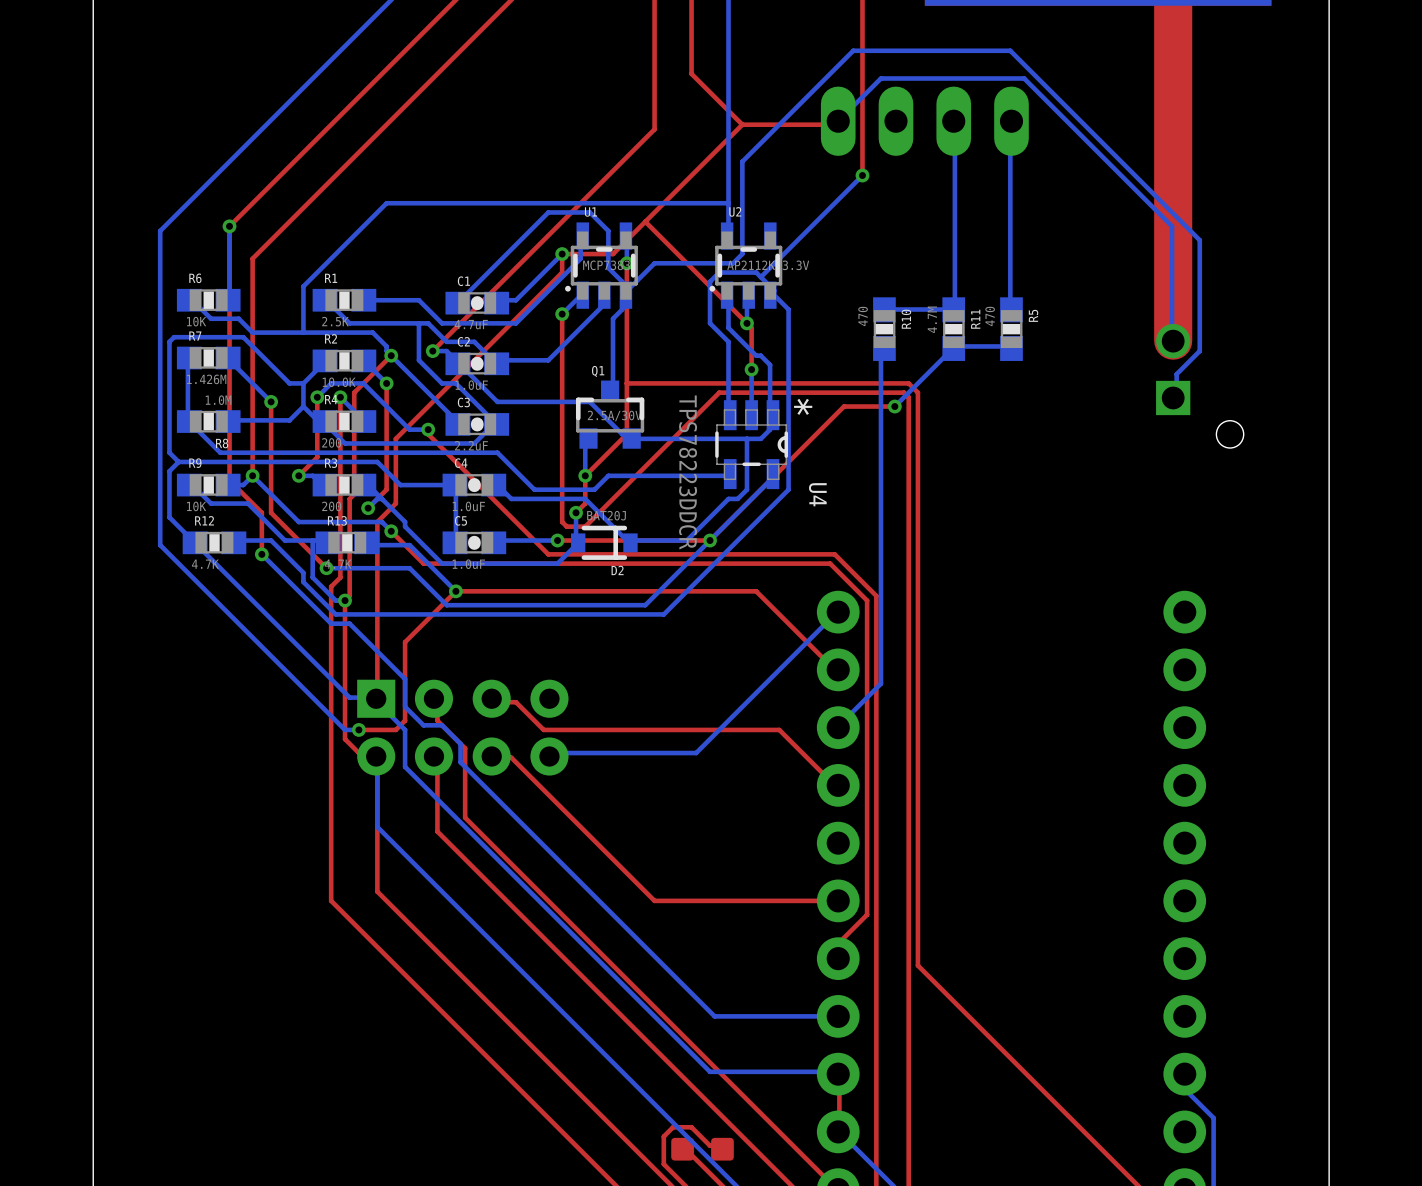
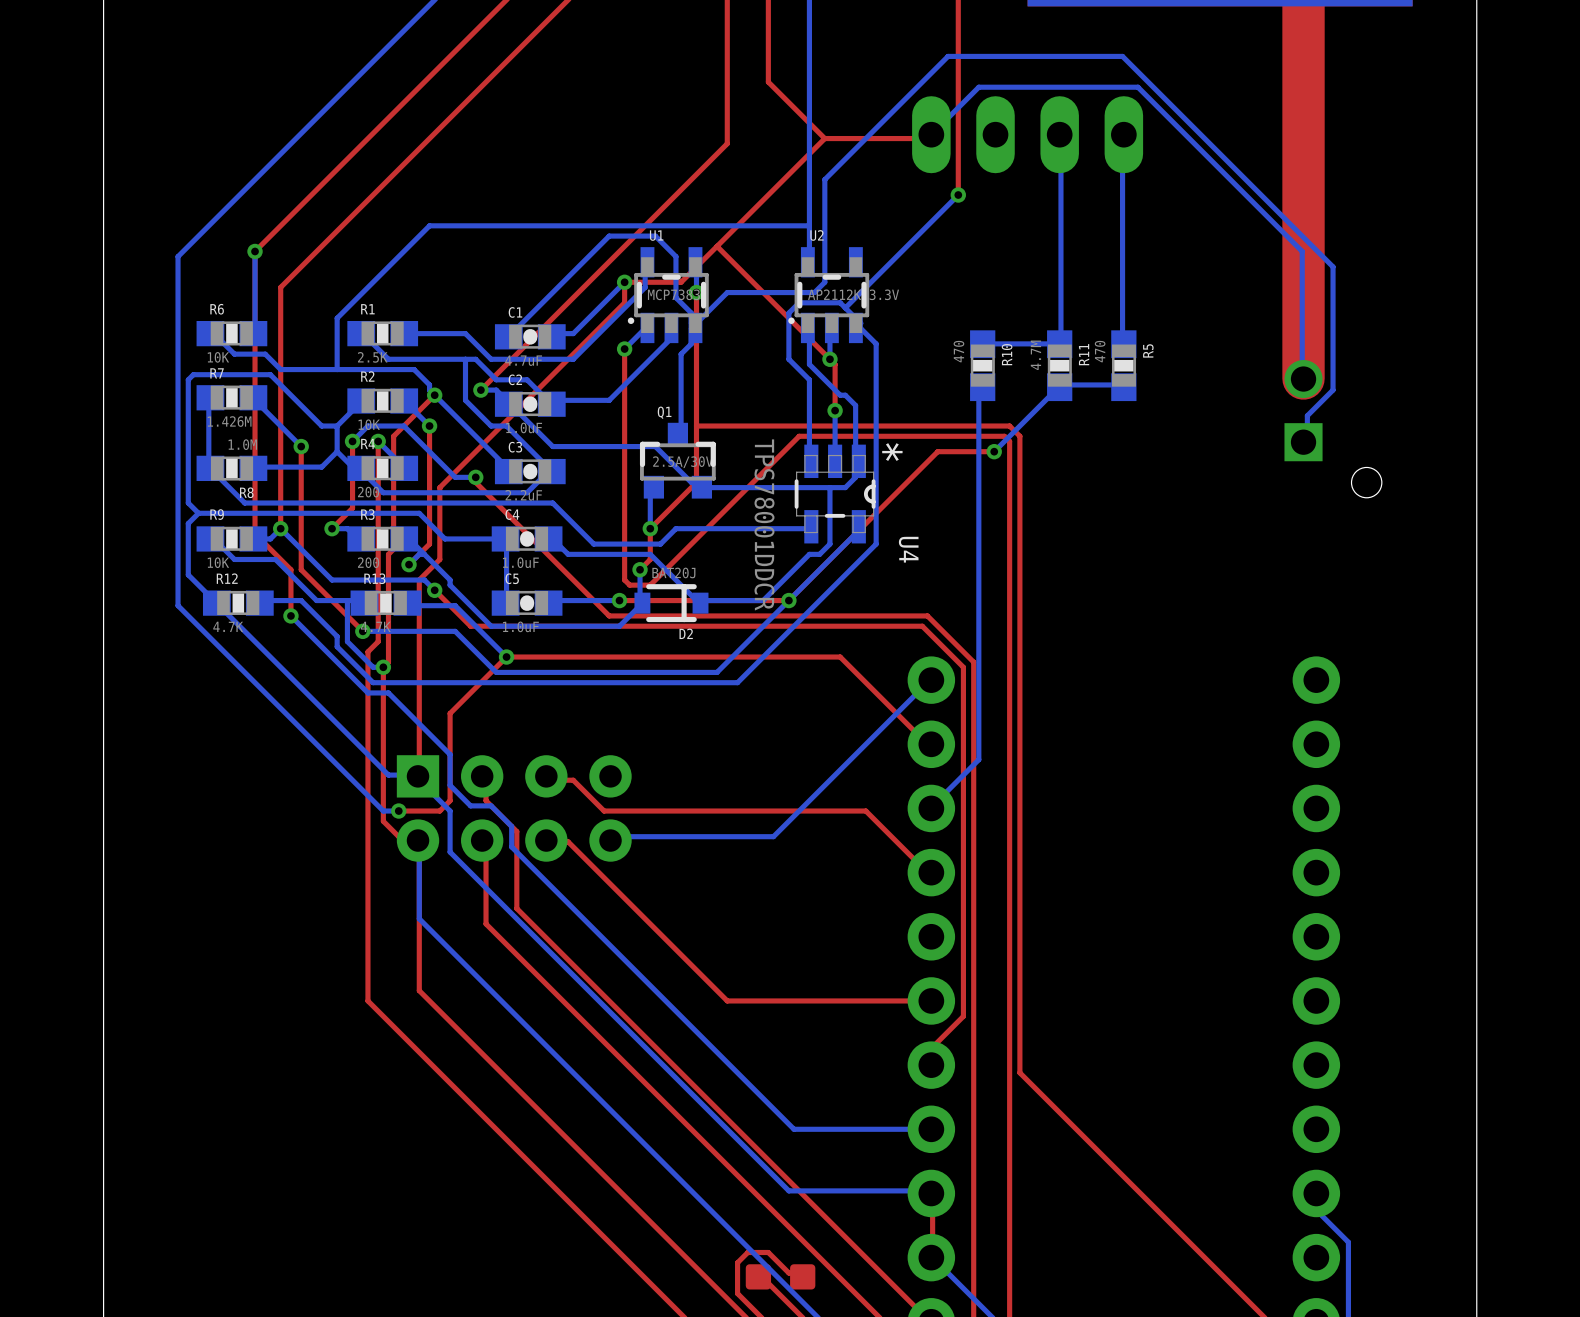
R2 value: 10.0K (339, 382) -> 10K (369, 424)
U4 value: TPS78223DDCR (688, 472) -> TPS78001DDCR (764, 524)

